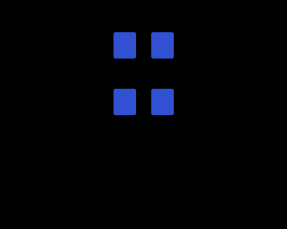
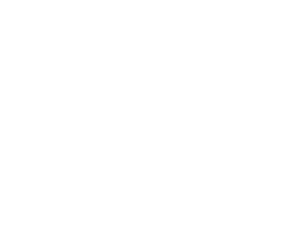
part: (143, 45) -> none
part: (143, 101) -> none

